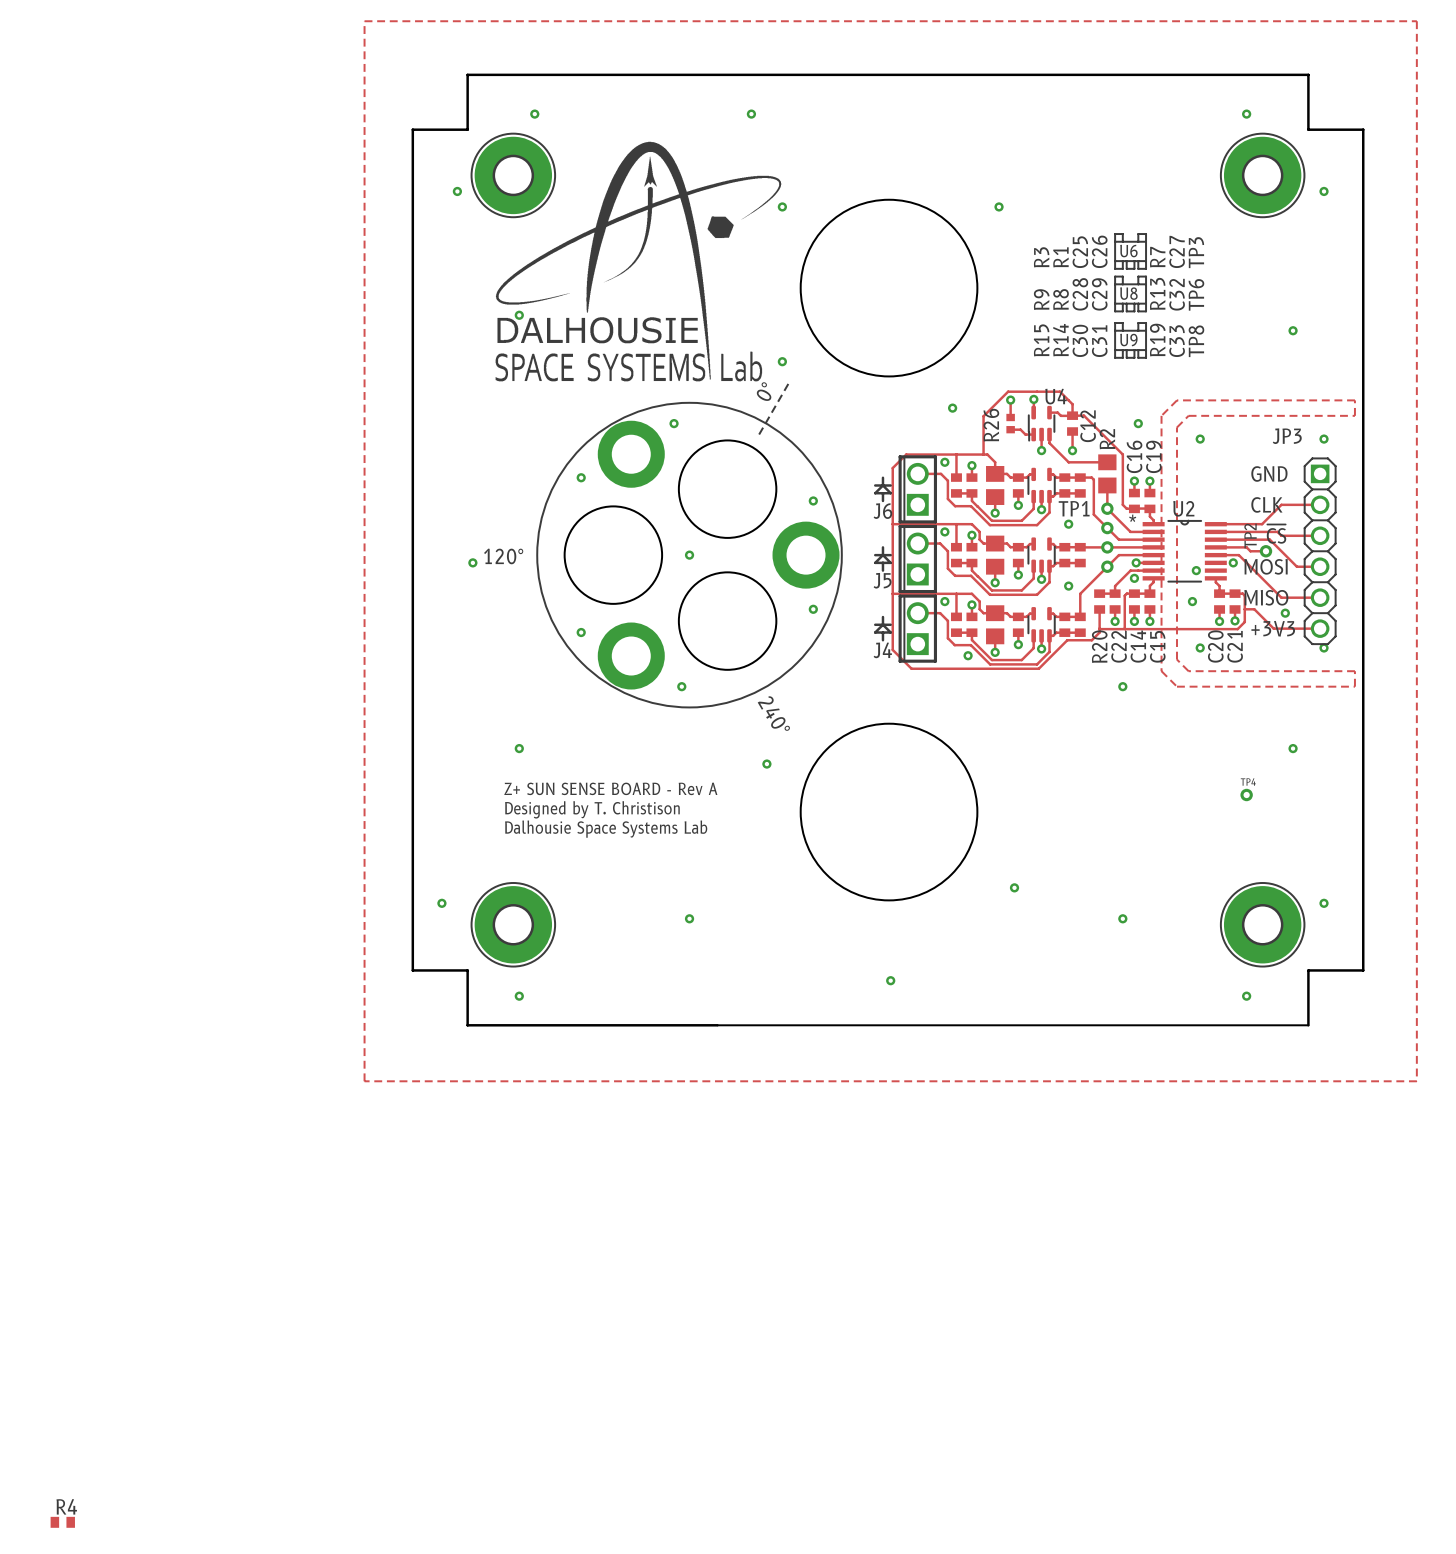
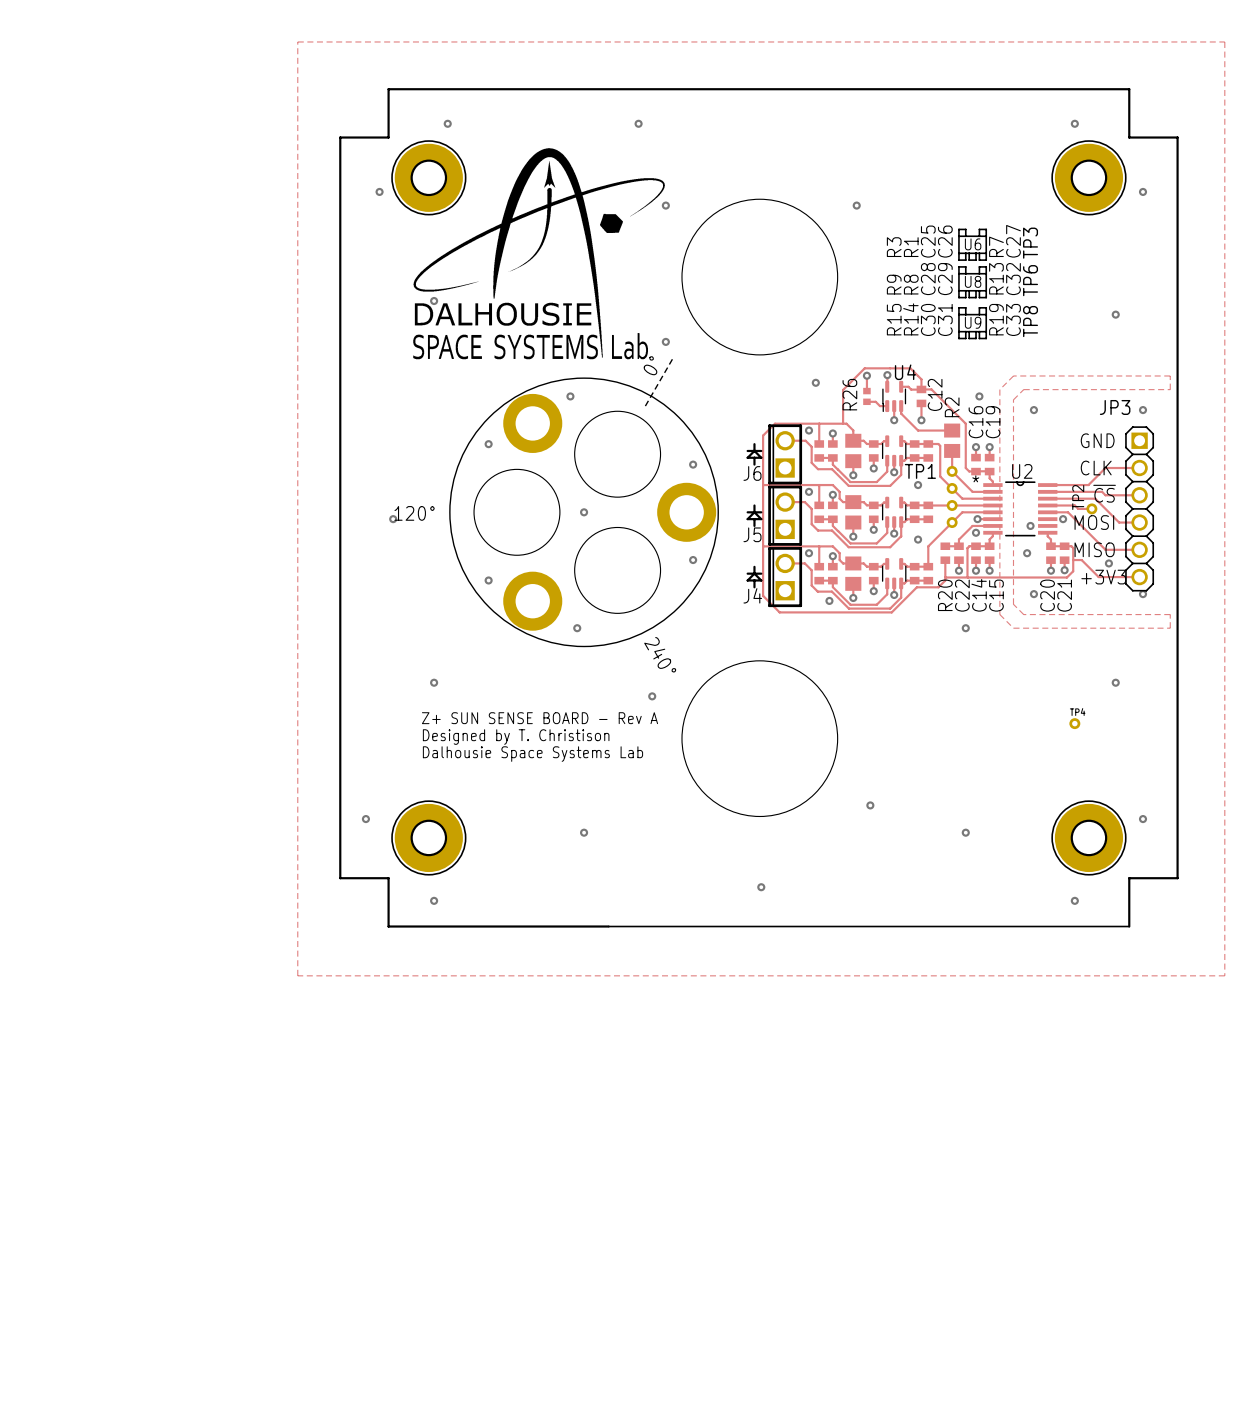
R4: (62, 1522) -> none

